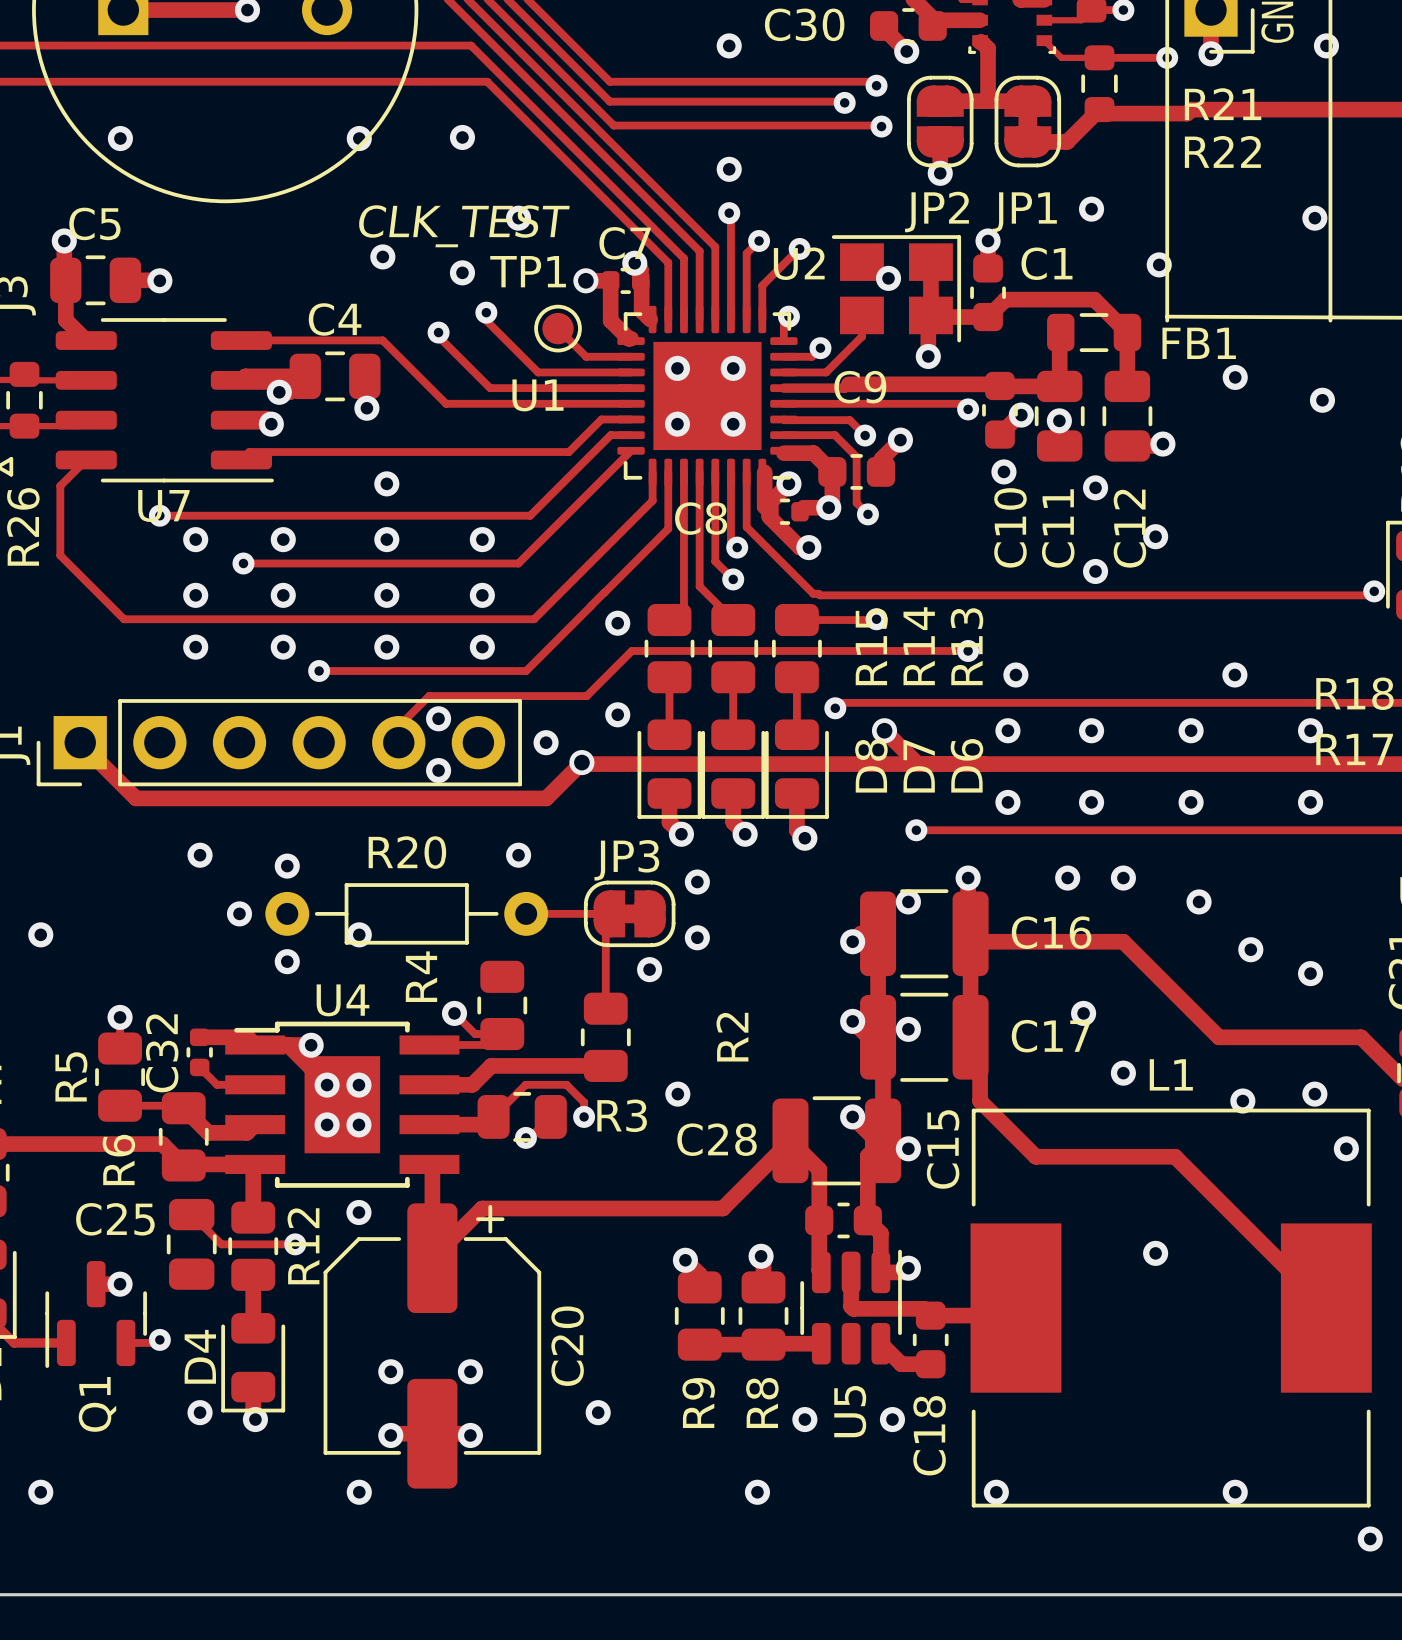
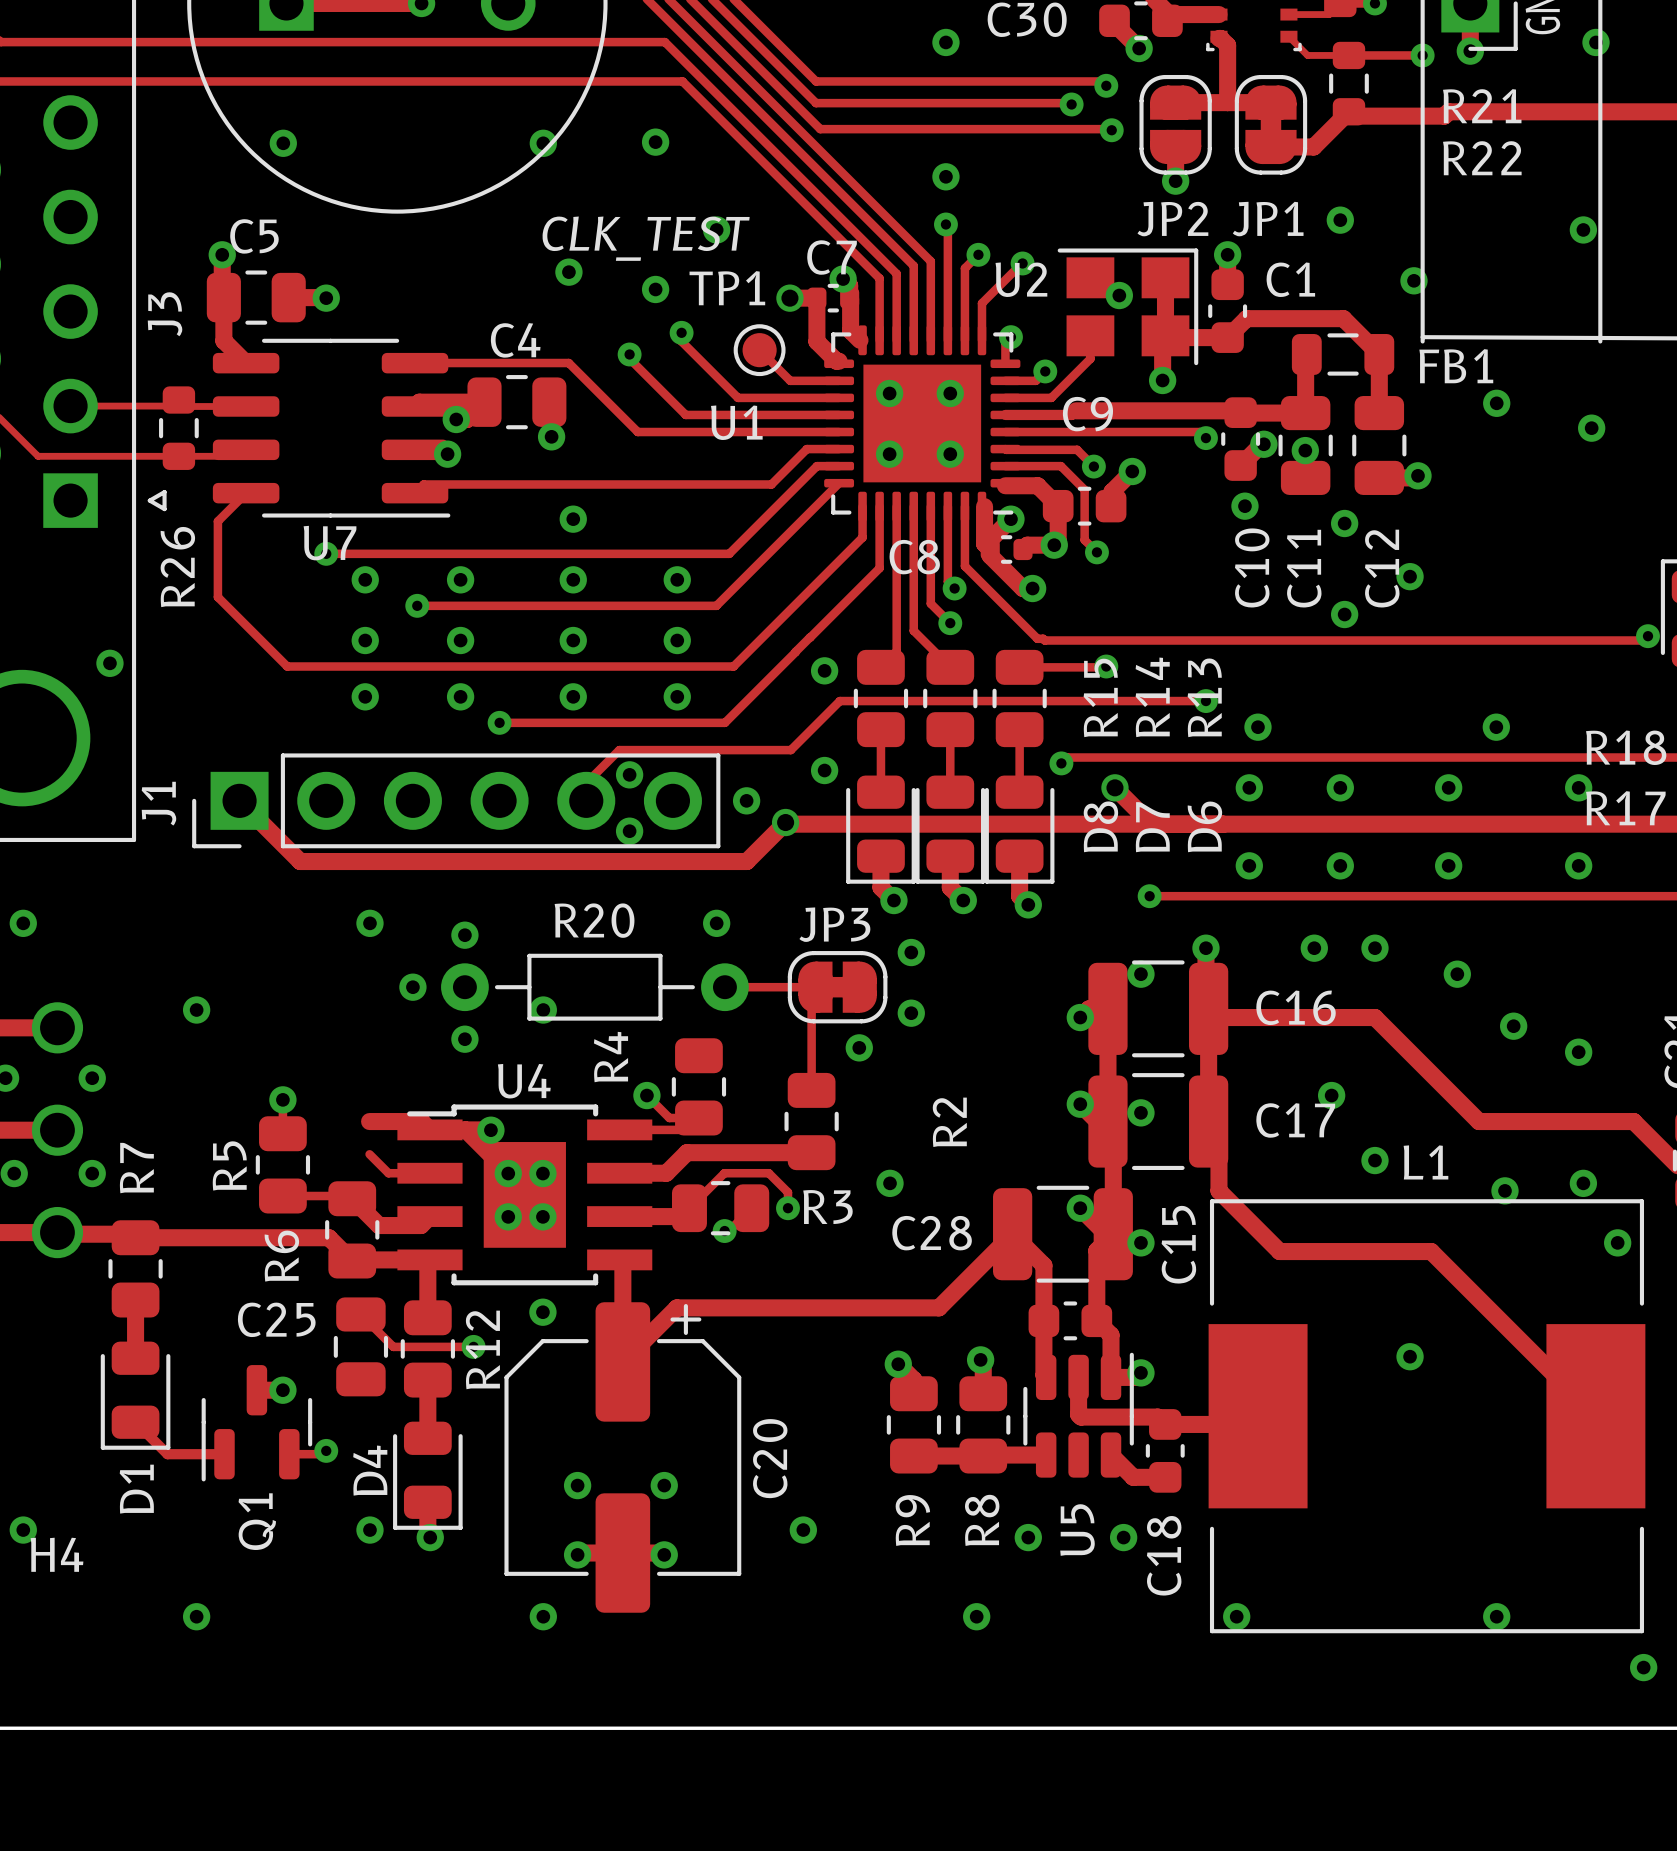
C32: (199, 1052) -> none

